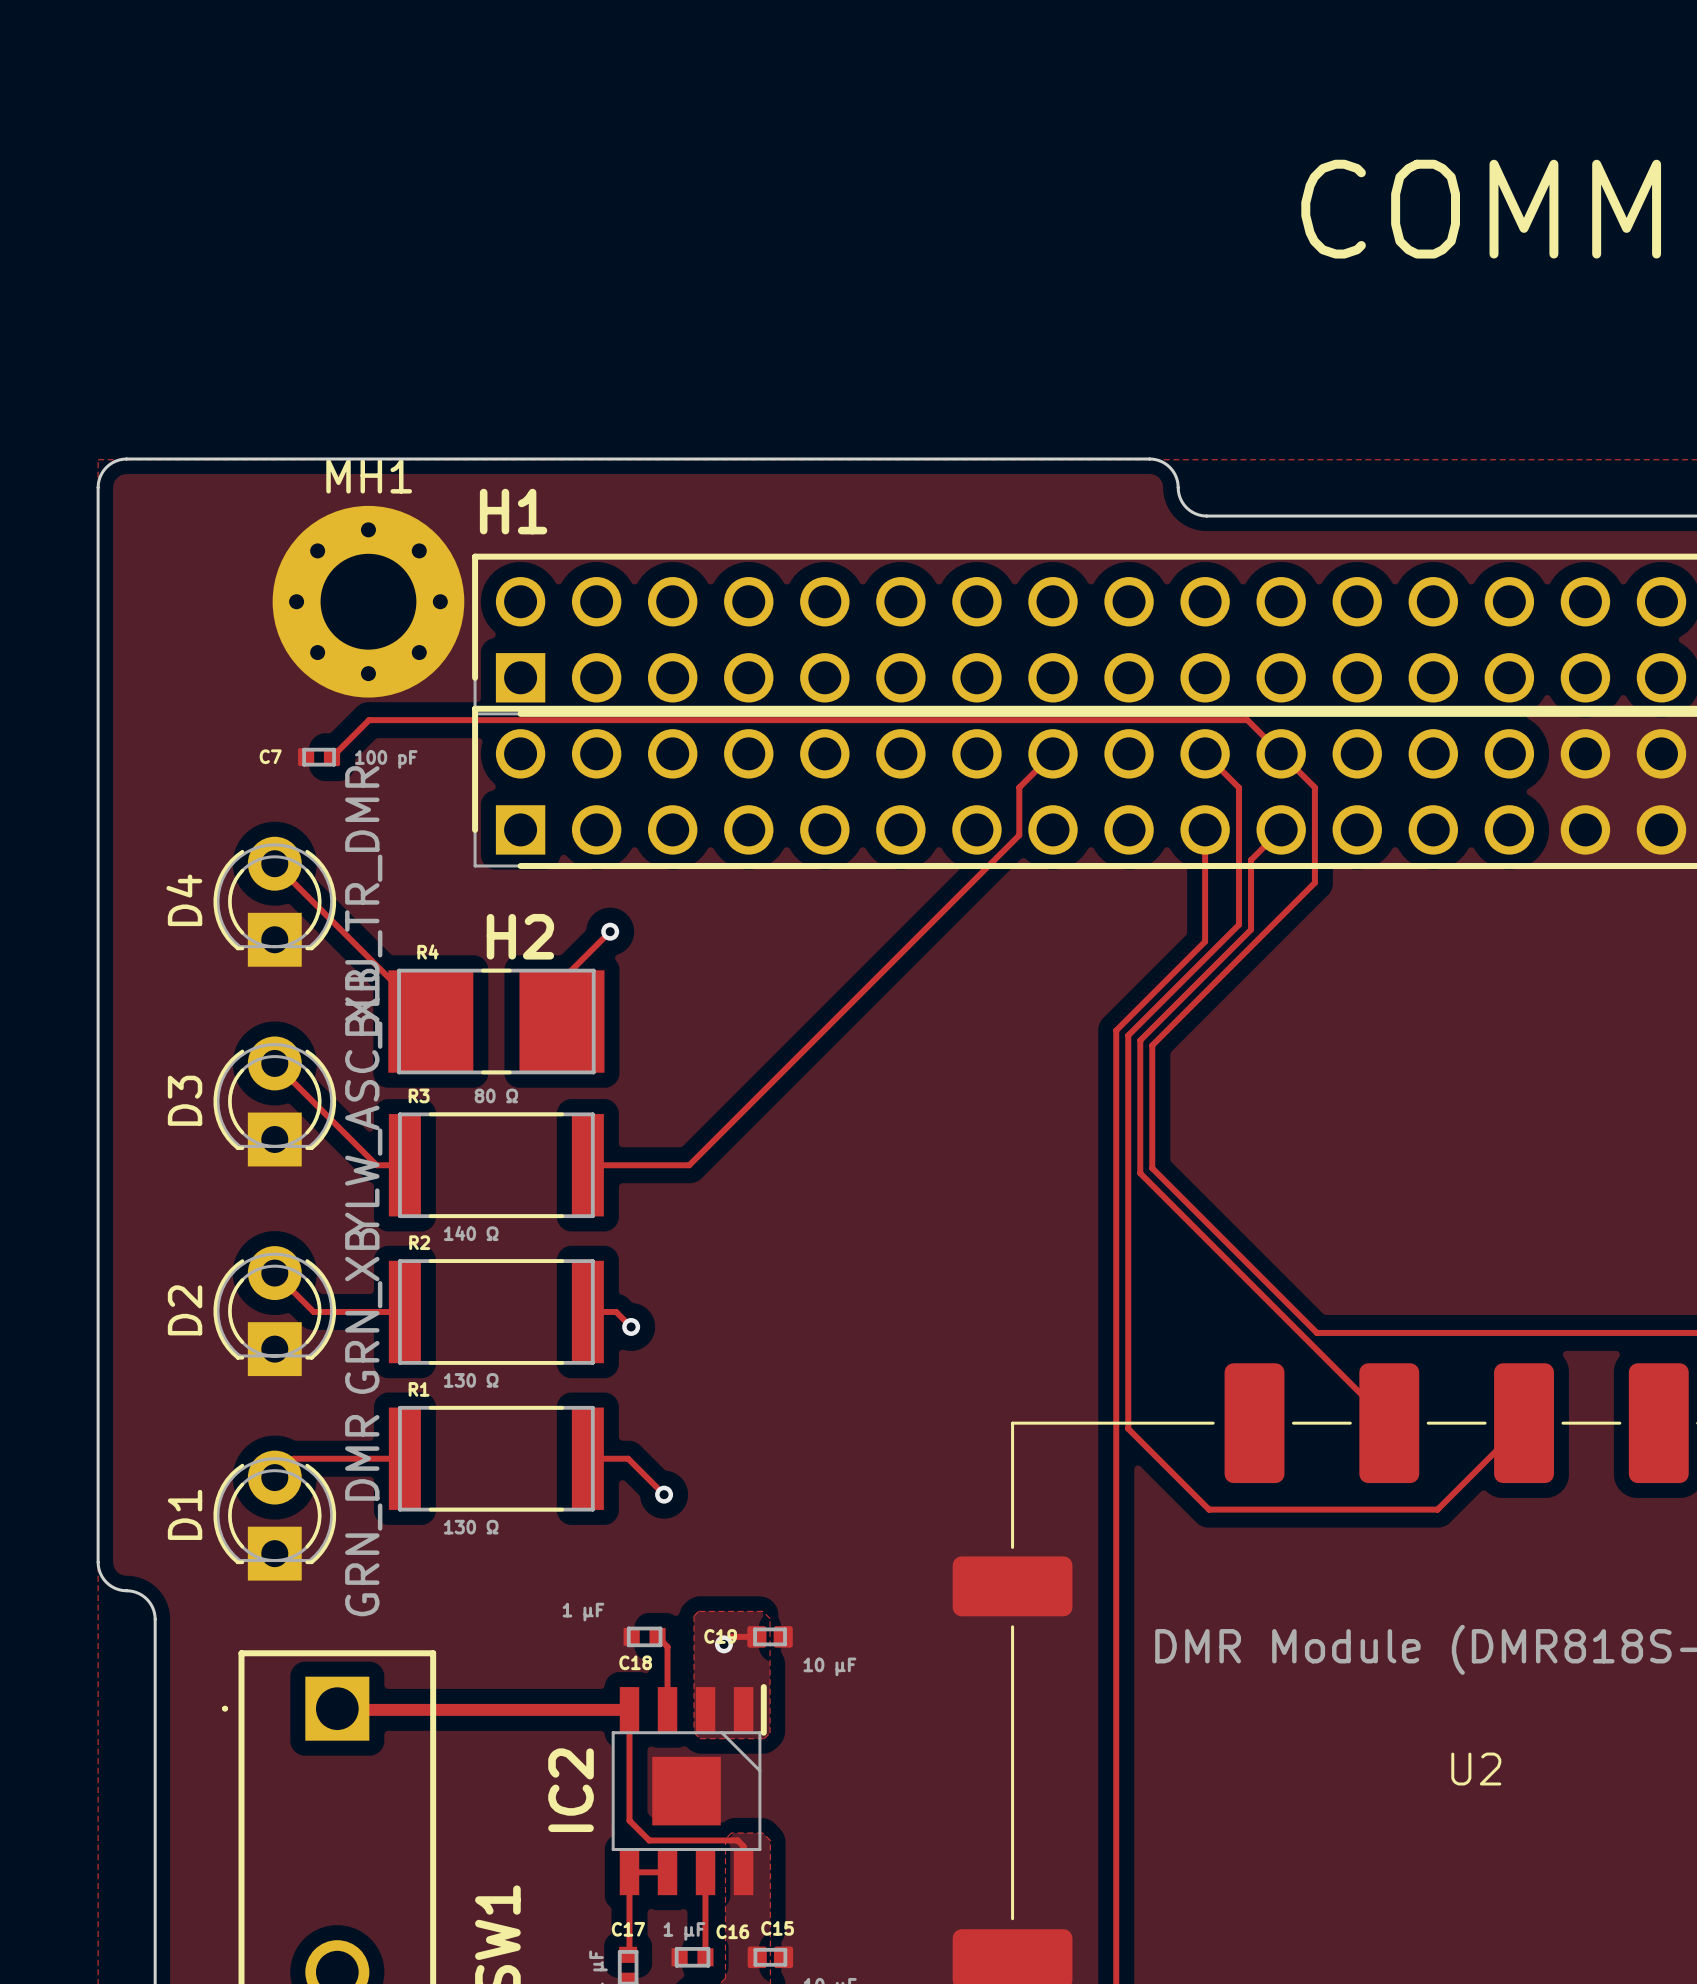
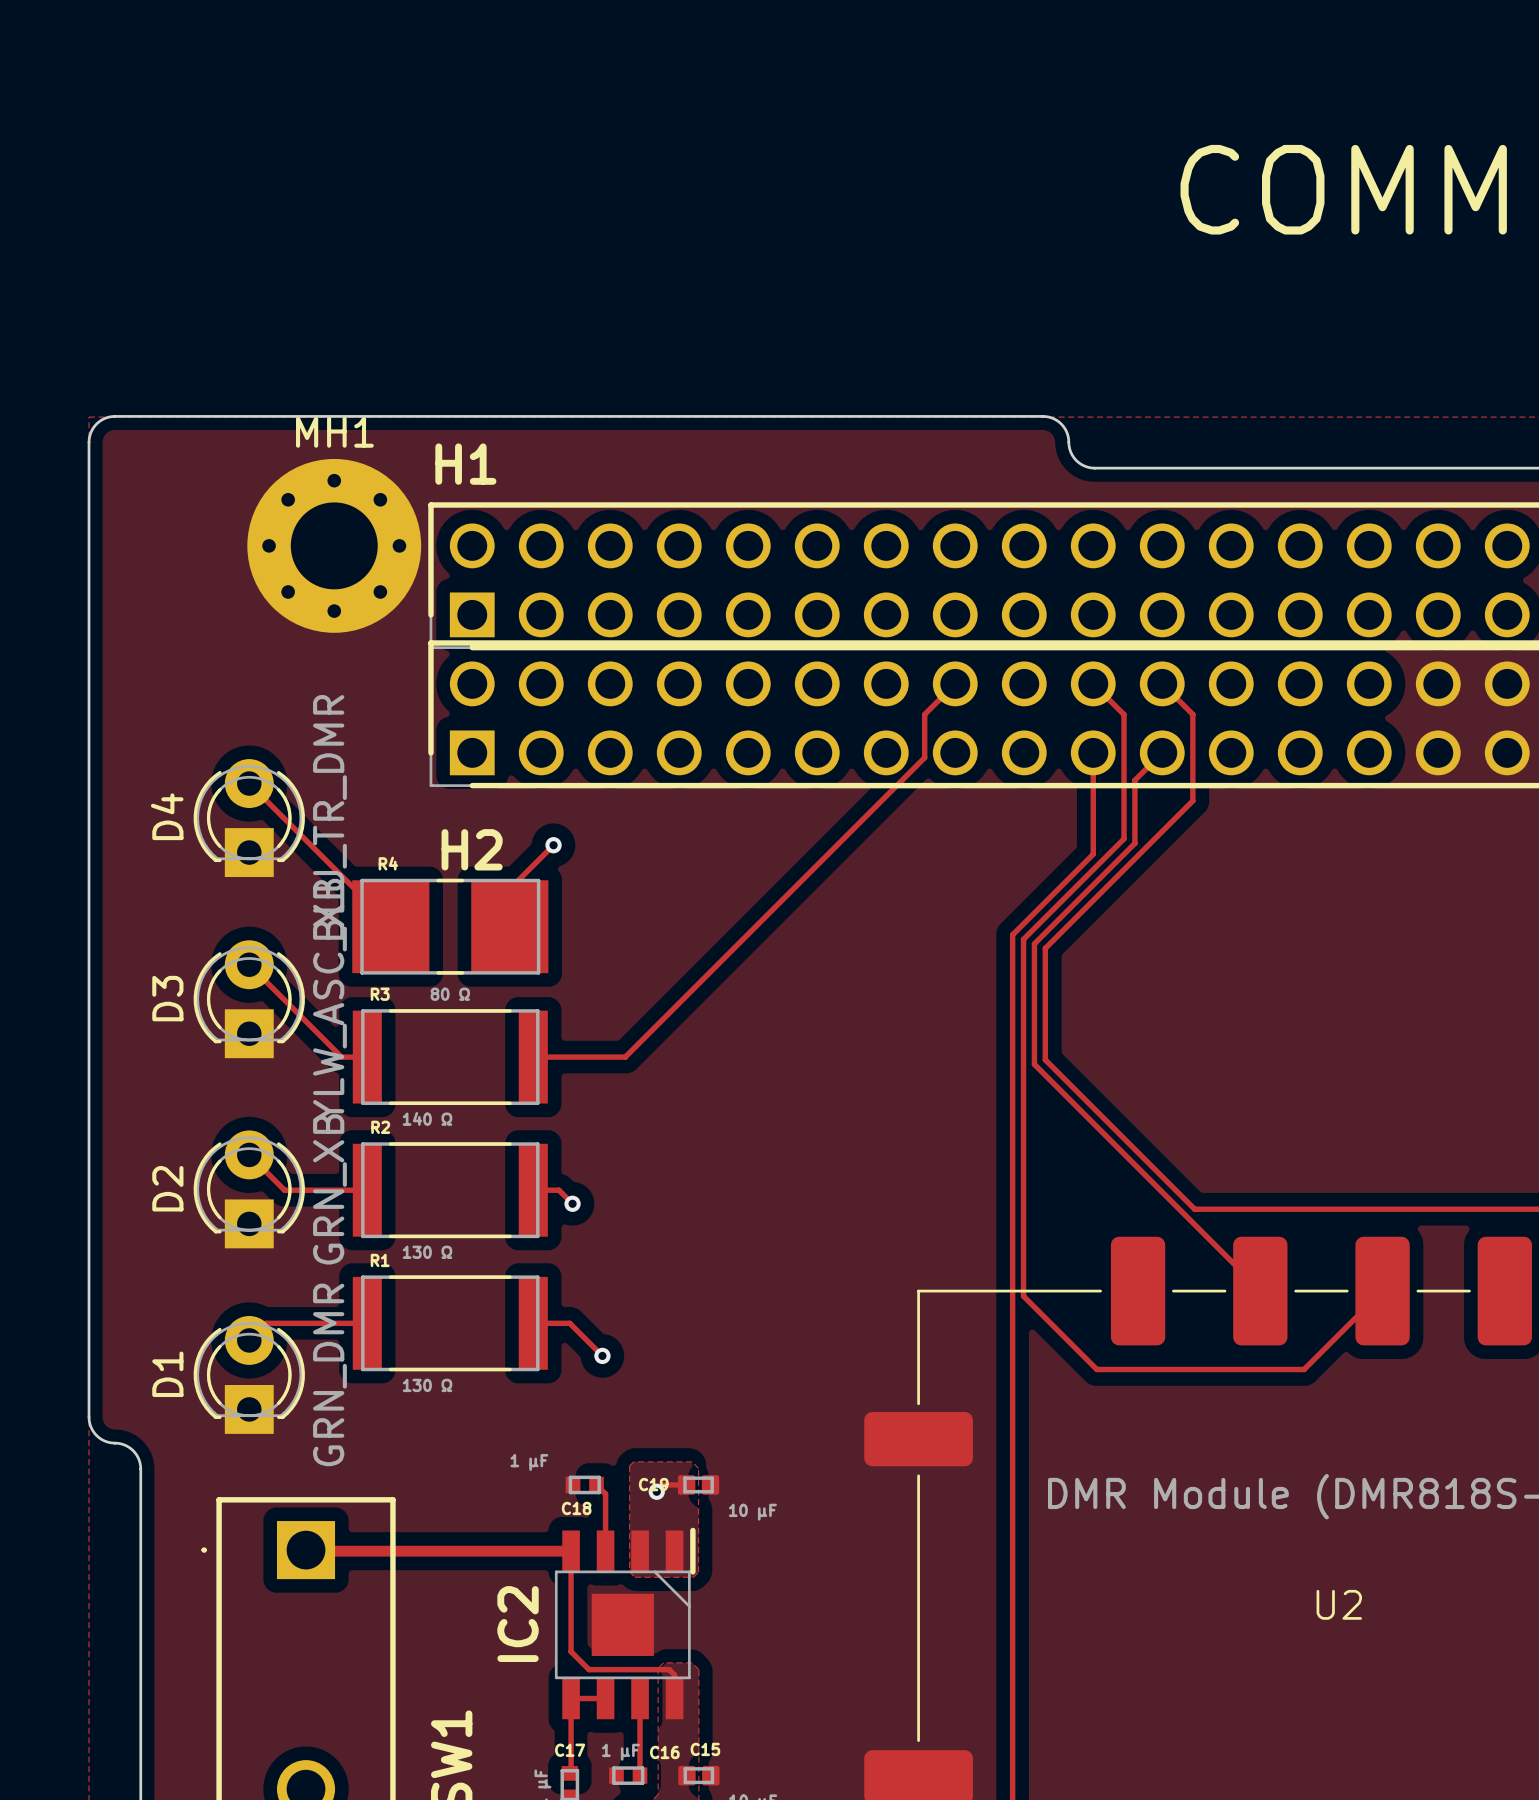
track: (1281, 753) (1247, 720) (369, 720) (332, 757) -> none
C7: 100 pF (319, 757) -> none

